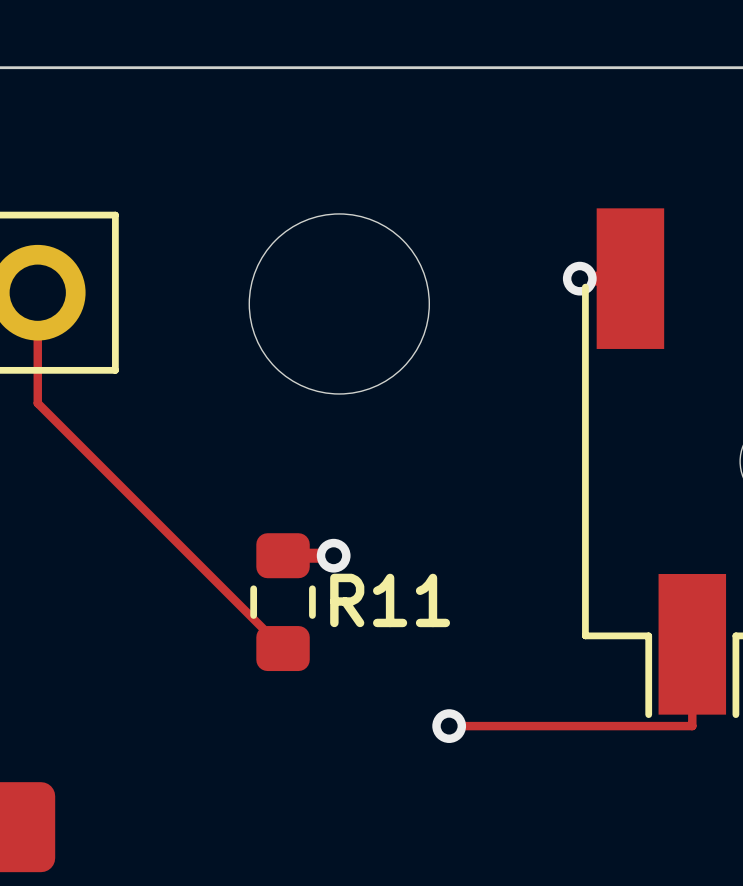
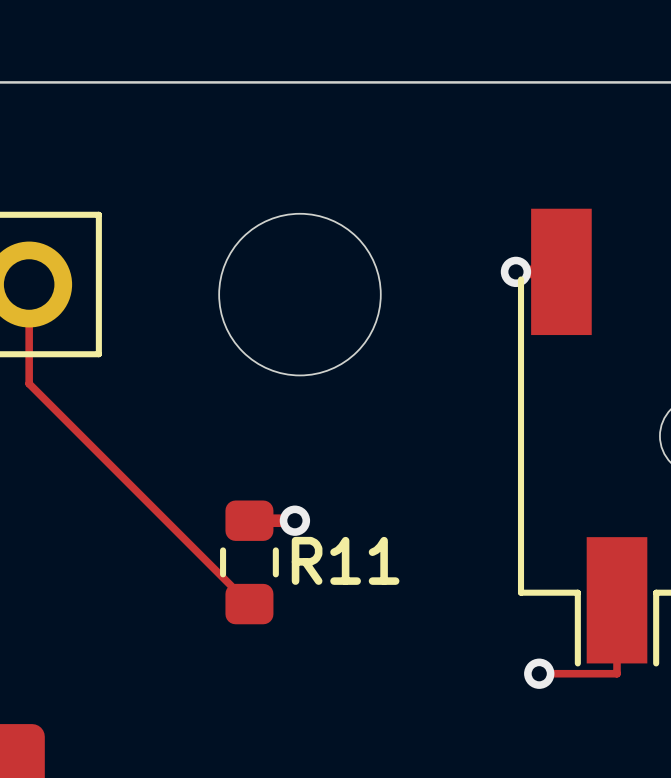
track: (449, 726) (605, 726) -> none
via position: (449, 726) -> (539, 673)

